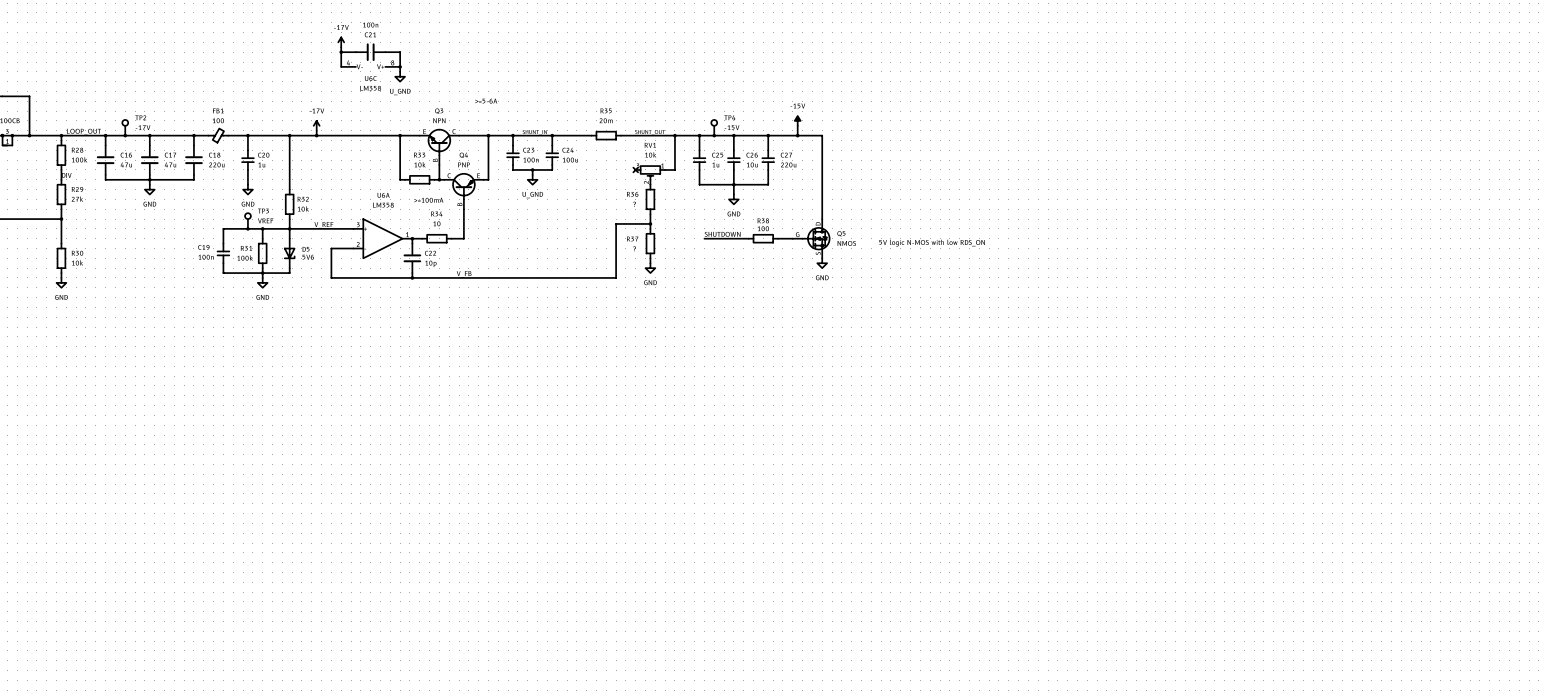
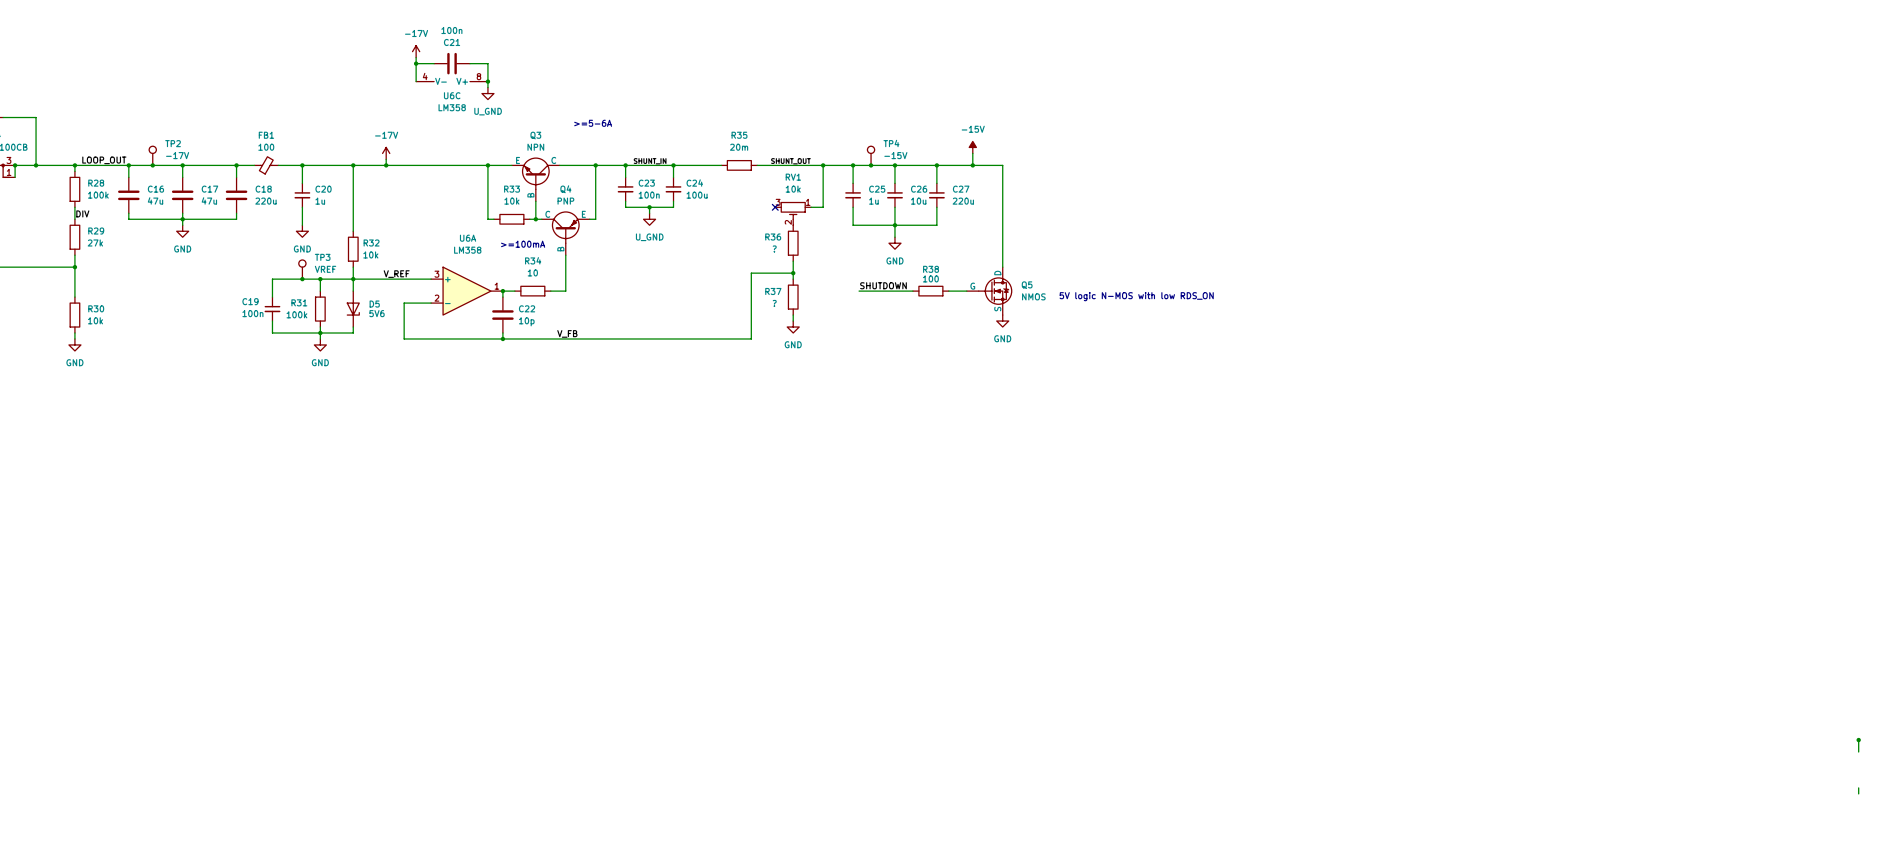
wire: none -> (1858, 740) (1858, 752)
junction: none -> (1858, 740)
wire: none -> (1858, 787) (1858, 793)

